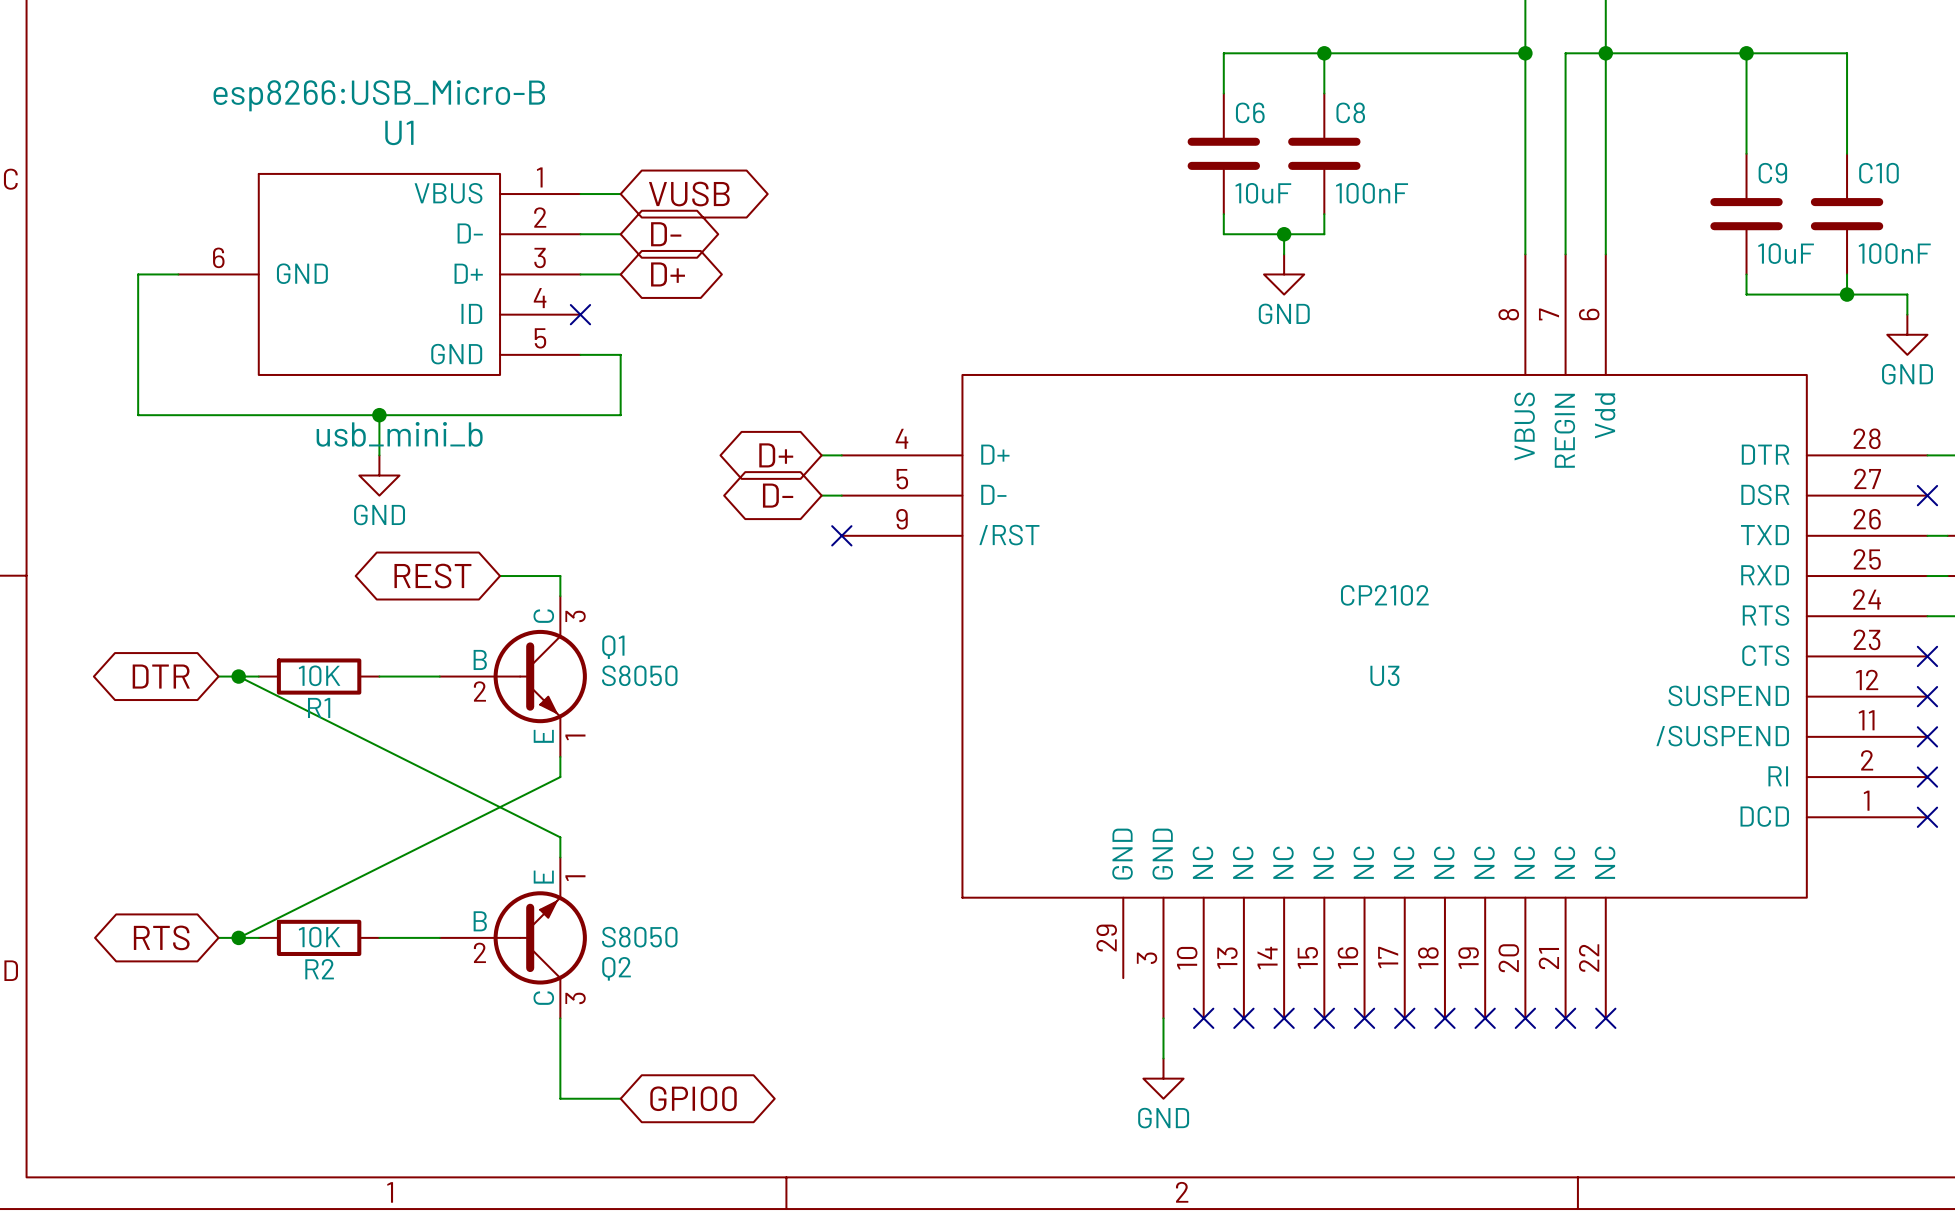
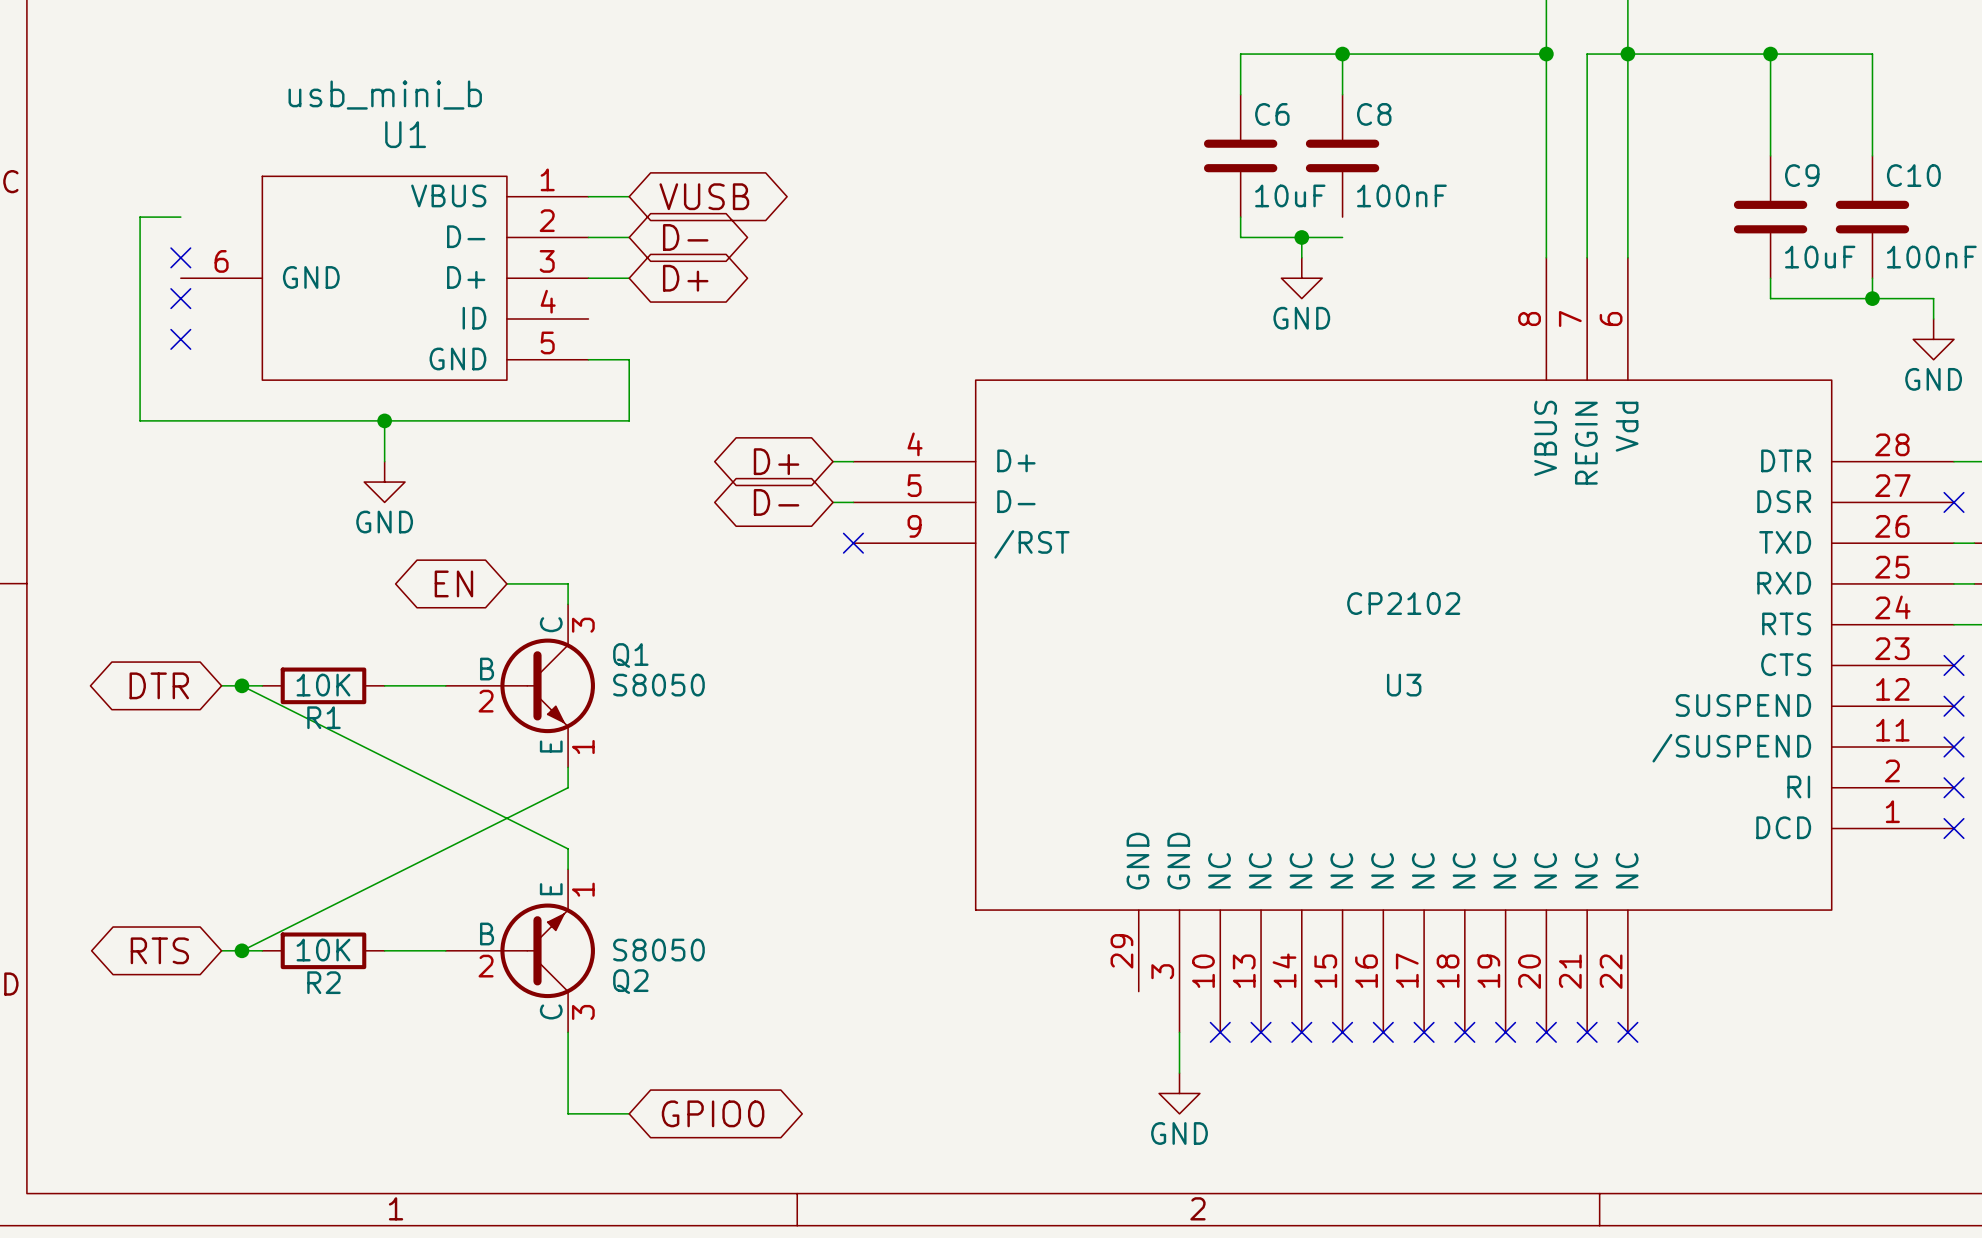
U1 text: esp8266:USB_Micro-B (379, 95) -> none
wire: (1324, 214) (1324, 234) -> none
no-connect mark: none -> (180, 257)
wire: (138, 274) (178, 274) -> (140, 278) (140, 217) (180, 217)
no-connect mark: none -> (180, 298)
no-connect mark: (580, 314) -> none
no-connect mark: none -> (180, 339)
U1 value position: usb_mini_b (399, 434) -> usb_mini_b (385, 95)
global label: REST (432, 576) -> EN (453, 583)

